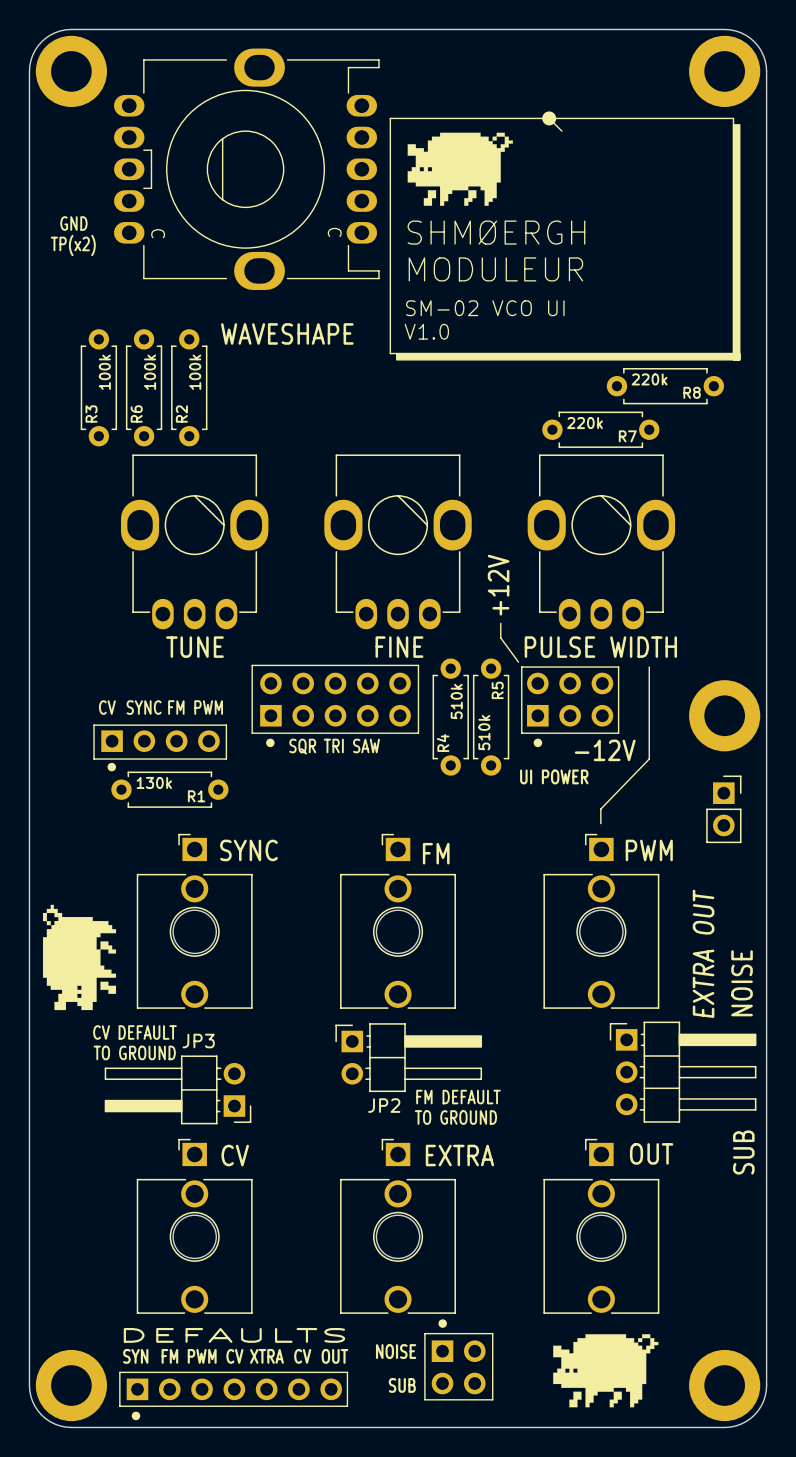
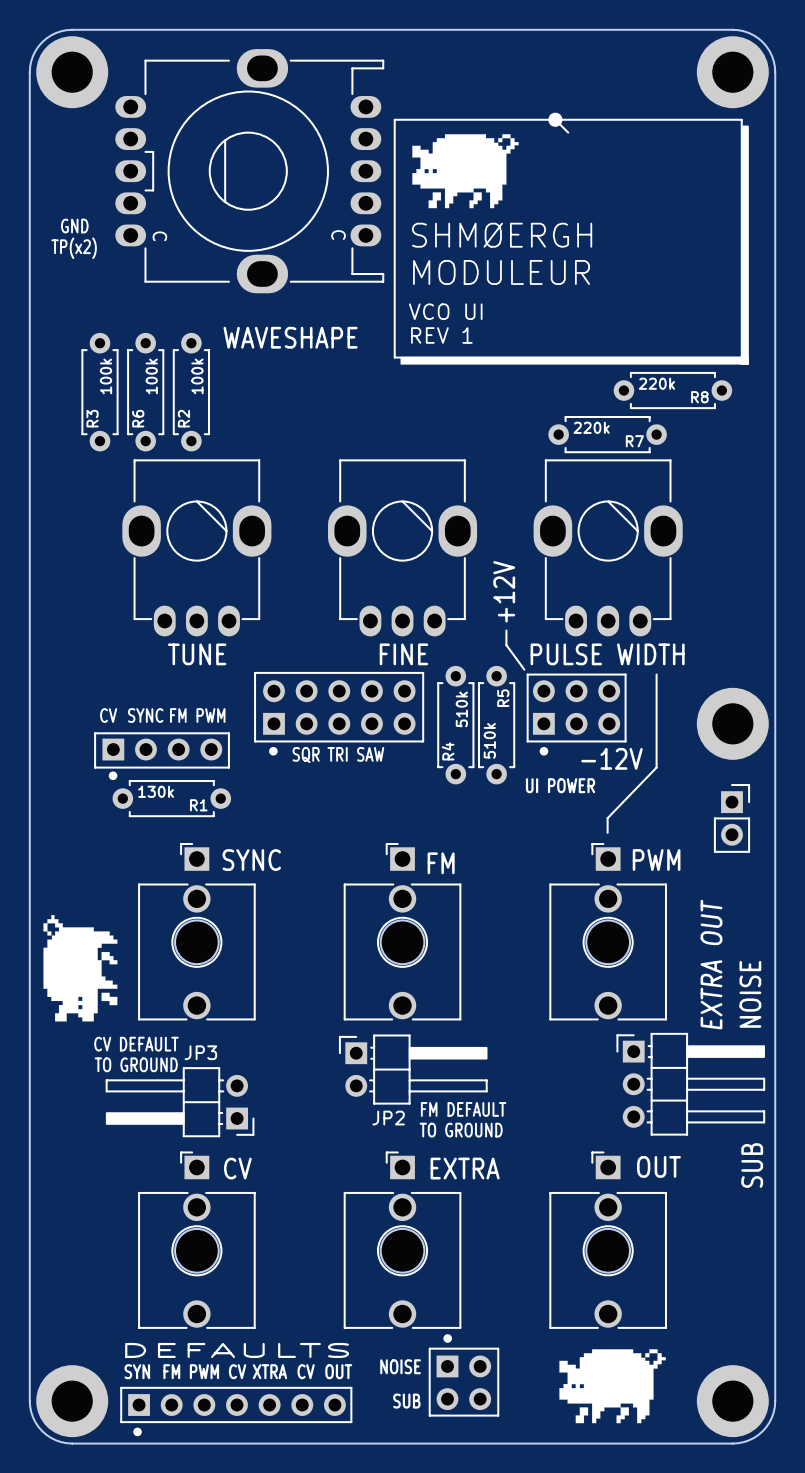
text: SM-02 VCO UI (485, 308) -> VCO UI (445, 311)
text: V1.0 (426, 331) -> REV 1 (441, 335)

